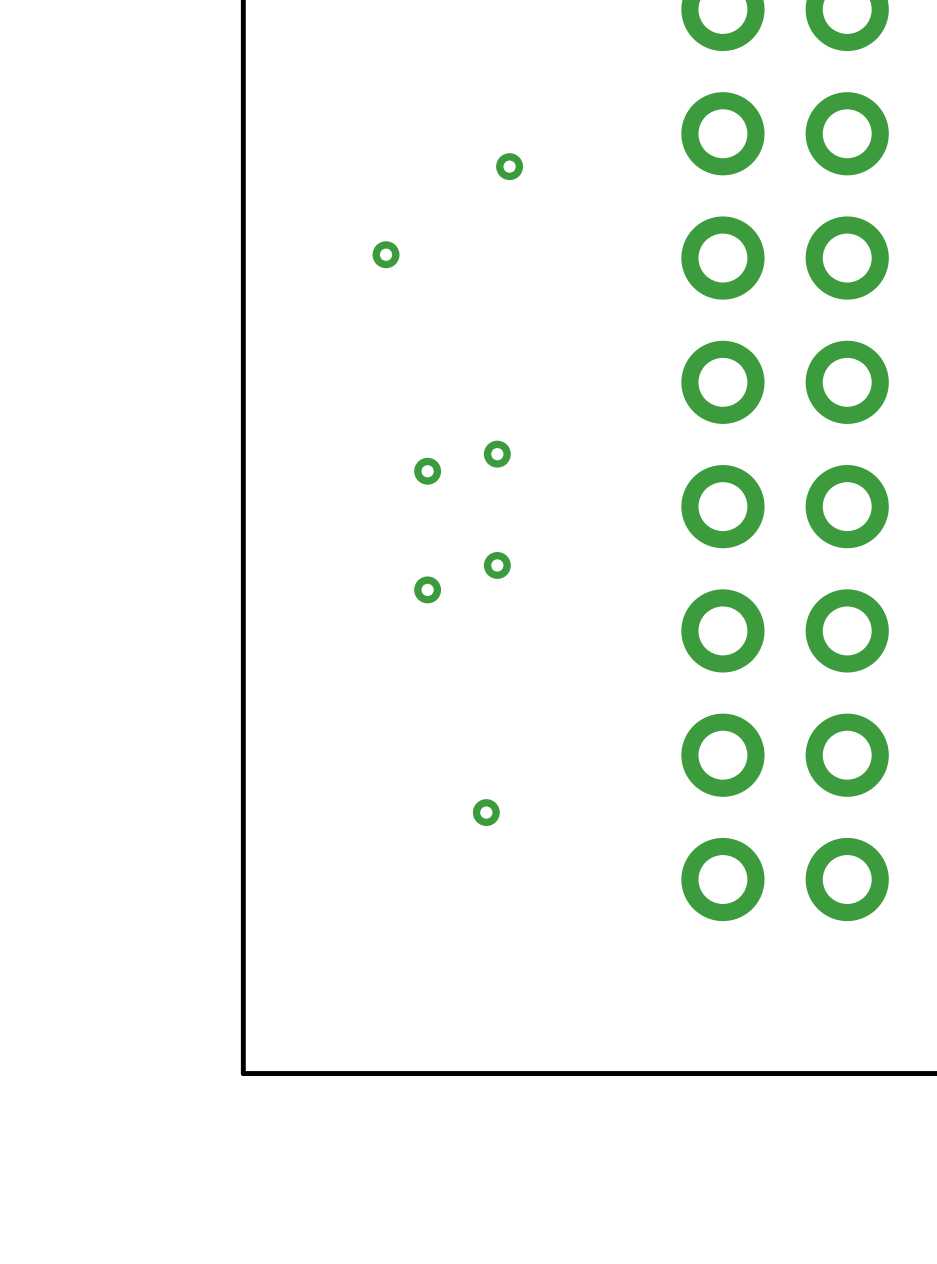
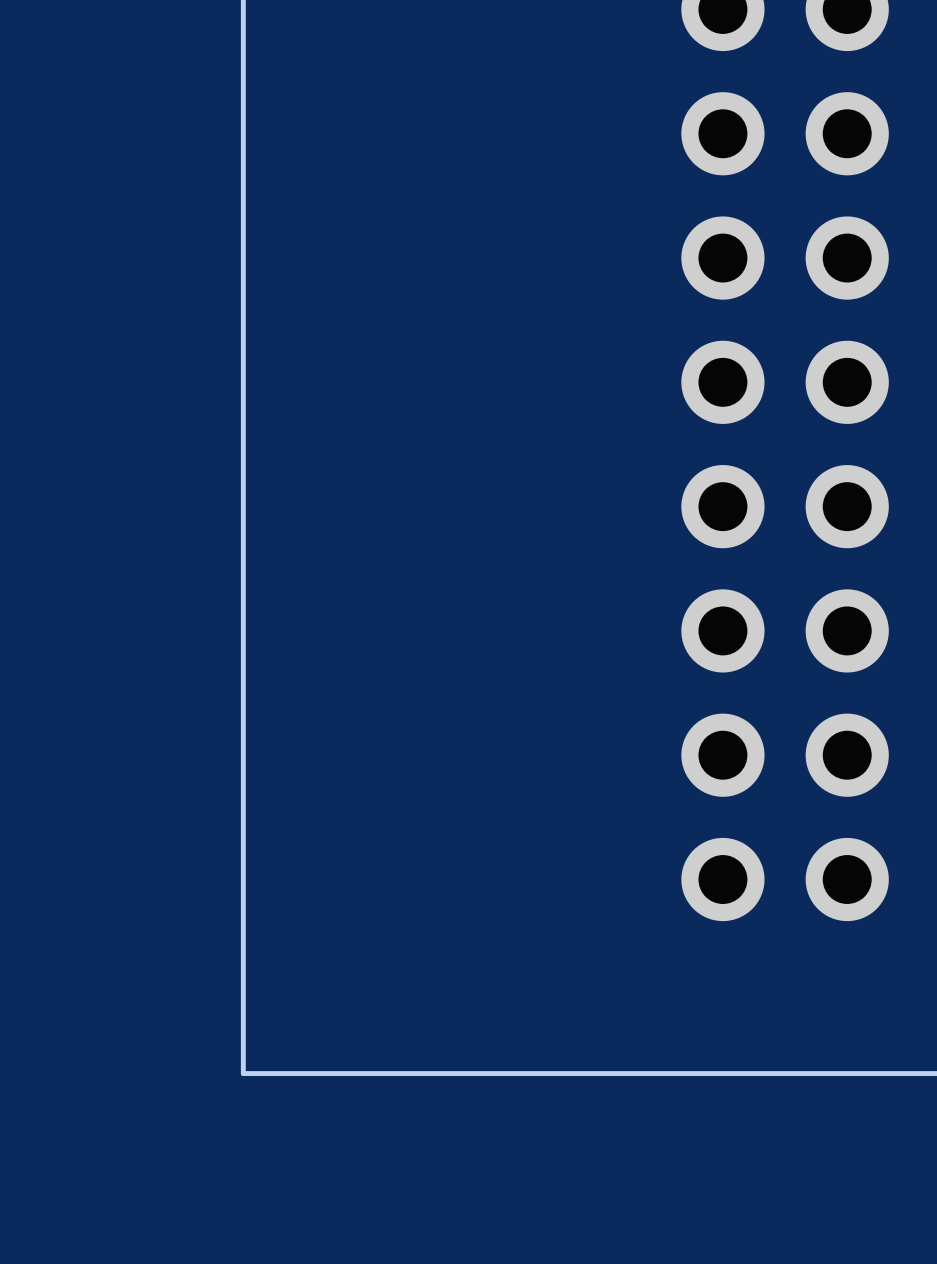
via: (509, 166) -> none
via: (386, 254) -> none
via: (497, 454) -> none
via: (427, 471) -> none
via: (497, 565) -> none
via: (427, 589) -> none
via: (486, 812) -> none

